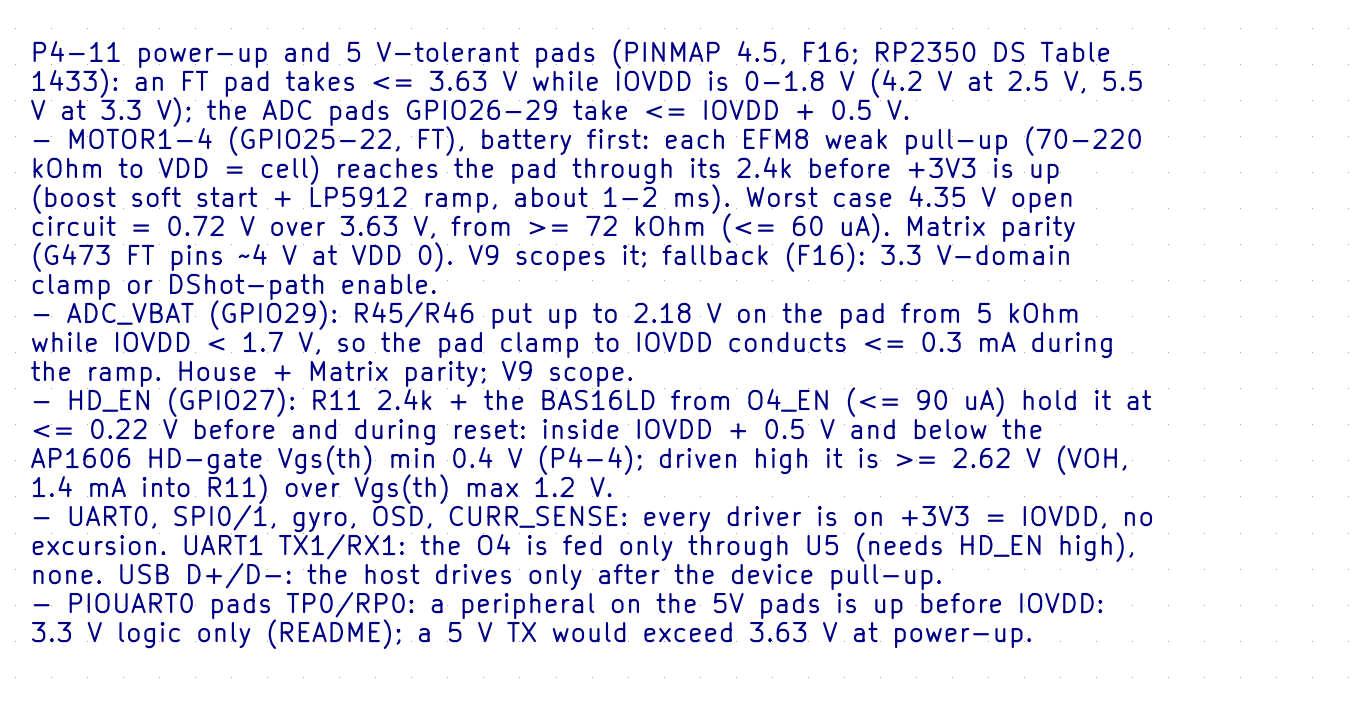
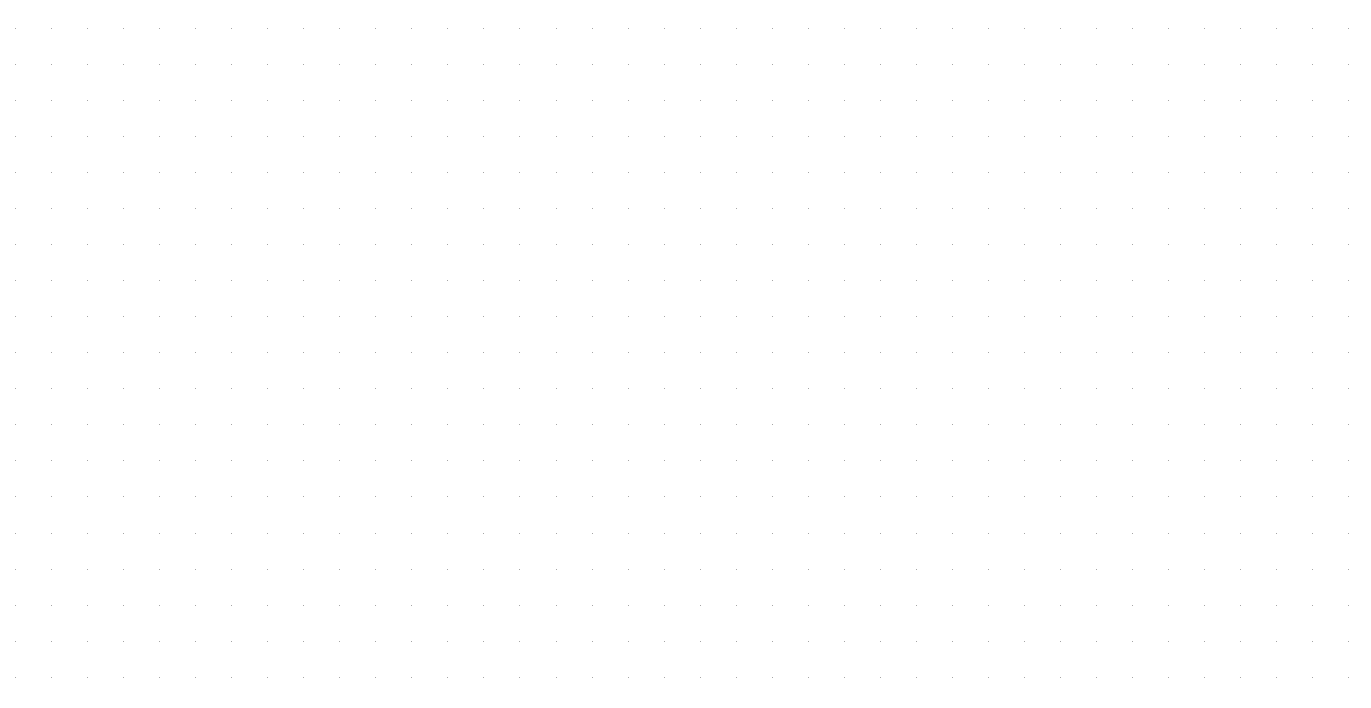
text: P4-11 power-up and 5 V-tolerant pads (PINMAP 4.5, F16; RP2350 DS Table (571, 54) -> none
text: 1433): an FT pad takes <= 3.63 V while IOVDD is 0-1.8 V (4.2 V at 2.5 V, 5.5 (587, 83) -> none
text: V at 3.3 V); the ADC pads GPIO26-29 take <= IOVDD + 0.5 V. (469, 112) -> none
text: - MOTOR1-4 (GPIO25-22, FT), battery first: each EFM8 weak pull-up (70-220 (587, 141) -> none
text: kOhm to VDD = cell) reaches the pad through its 2.4k before +3V3 is up (546, 170) -> none
text: (boost soft start + LP5912 ramp, about 1-2 ms). Worst case 4.35 V open (552, 199) -> none
text: circuit = 0.72 V over 3.63 V, from >= 72 kOhm (<= 60 uA). Matrix parity (553, 228) -> none
text: (G473 FT pins ~4 V at VDD 0). V9 scopes it; fallback (F16): 3.3 V-domain (551, 257) -> none
text: clamp or DShot-path enable. (234, 286) -> none
text: - ADC_VBAT (GPIO29): R45/R46 put up to 2.18 V on the pad from 5 kOhm (555, 315) -> none
text: while IOVDD < 1.7 V, so the pad clamp to IOVDD conducts <= 0.3 mA during (571, 344) -> none
text: the ramp. House + Matrix parity; V9 scope. (331, 373) -> none
text: - HD_EN (GPIO27): R11 2.4k + the BAS16LD from O4_EN (<= 90 uA) hold it at (592, 402) -> none
text: <= 0.22 V before and during reset: inside IOVDD + 0.5 V and below the (537, 432) -> none
text: AP1606 HD-gate Vgs(th) min 0.4 V (P4-4); driven high it is >= 2.62 V (VOH, (578, 460) -> none
text: 1.4 mA into R11) over Vgs(th) max 1.2 V. (322, 489) -> none
text: - UART0, SPI0/1, gyro, OSD, CURR_SENSE: every driver is on +3V3 = IOVDD, no (592, 518) -> none
text: excursion. UART1 TX1/RX1: the O4 is fed only through U5 (needs HD_EN high), (582, 547) -> none
text: none. USB D+/D-: the host drives only after the device pull-up. (487, 576) -> none
text: - PIOUART0 pads TP0/RP0: a peripheral on the 5V pads is up before IOVDD: (567, 605) -> none
text: 3.3 V logic only (README); a 5 V TX would exceed 3.63 V at power-up. (531, 634) -> none

